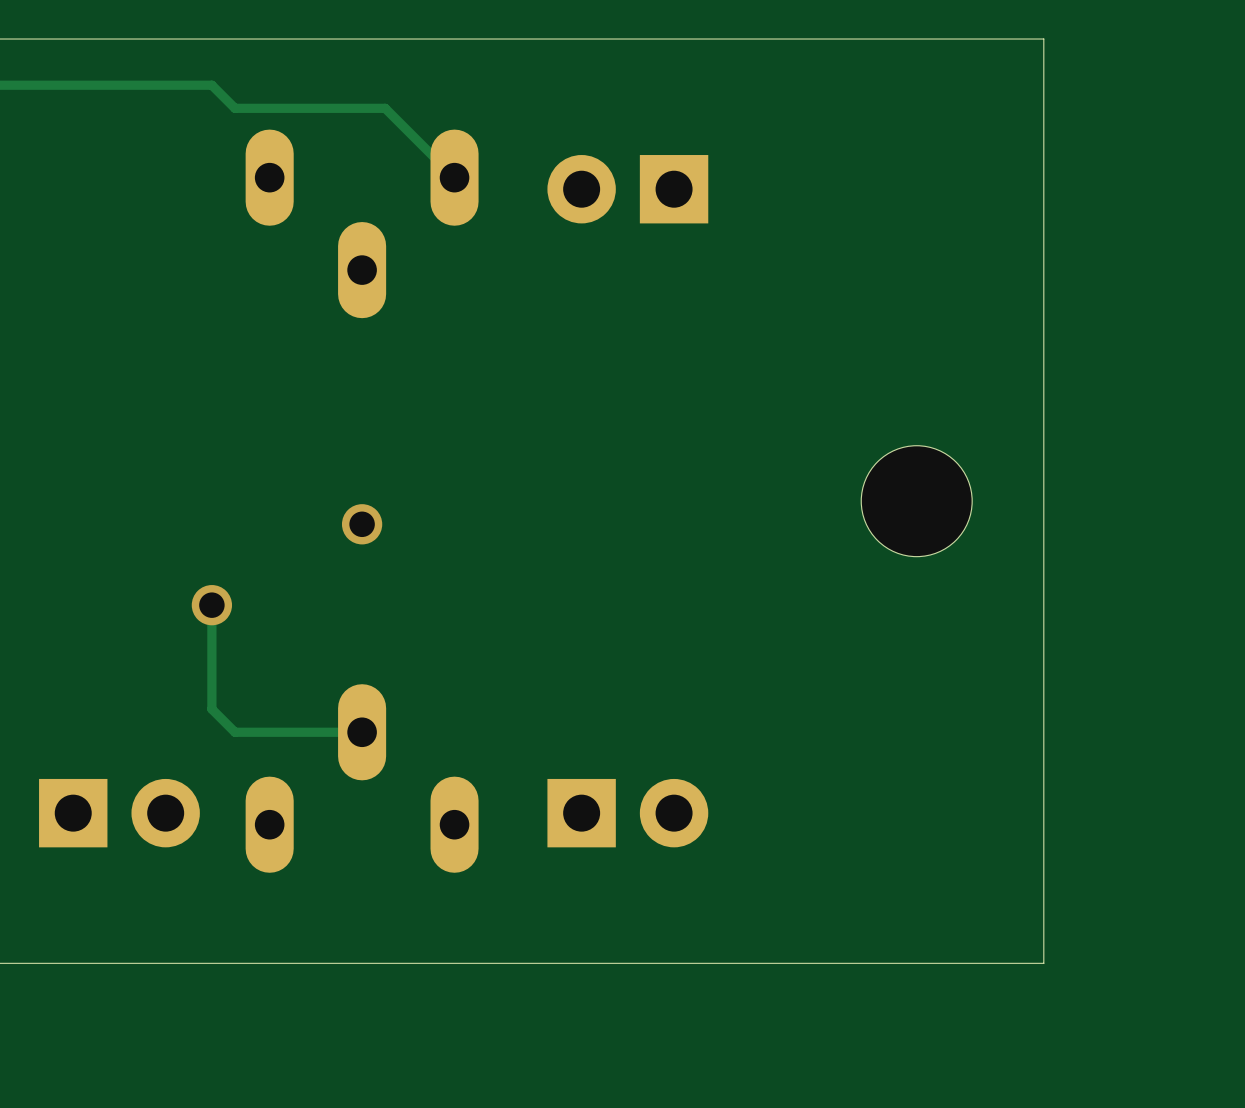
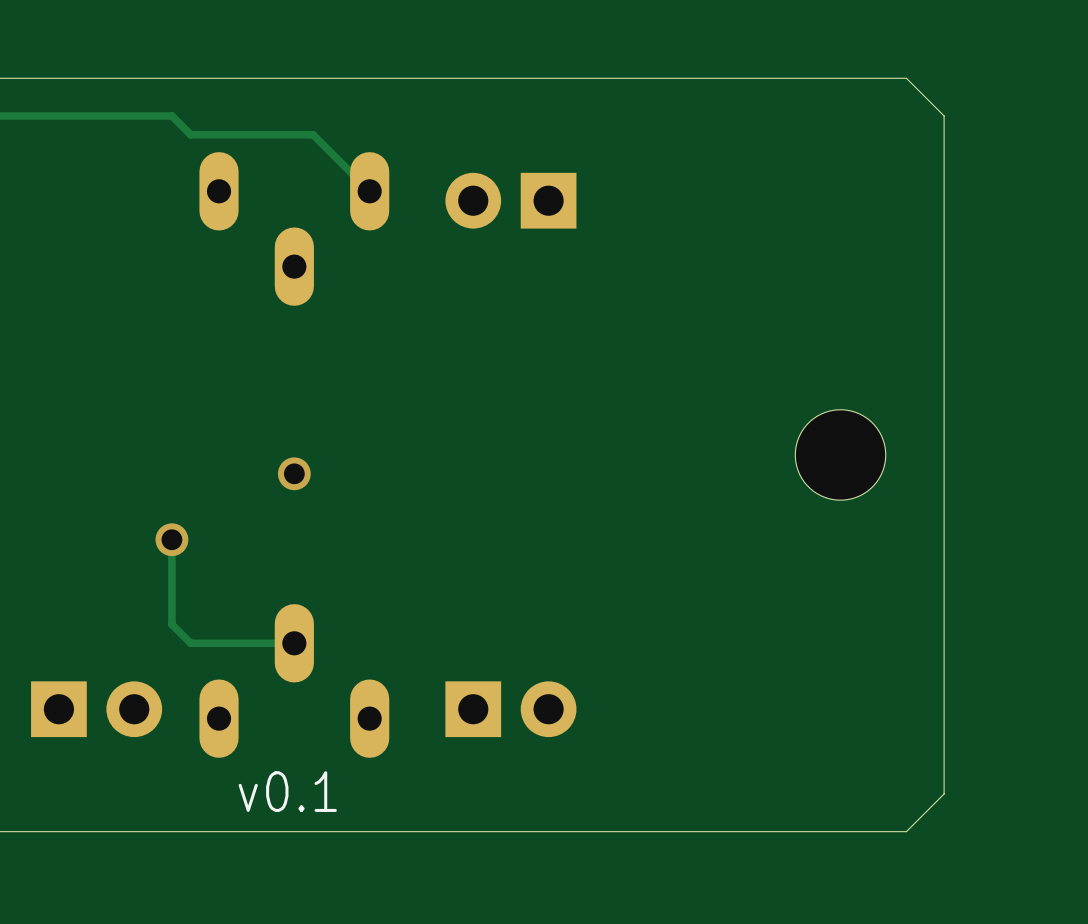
board edge: (1043, 39) (1043, 963) -> (849, 78) (906, 78) (944, 115) (944, 793) (906, 831) (849, 831)
hole position: (916, 501) -> (840, 454)
text: none -> v0.1 (287, 791)

